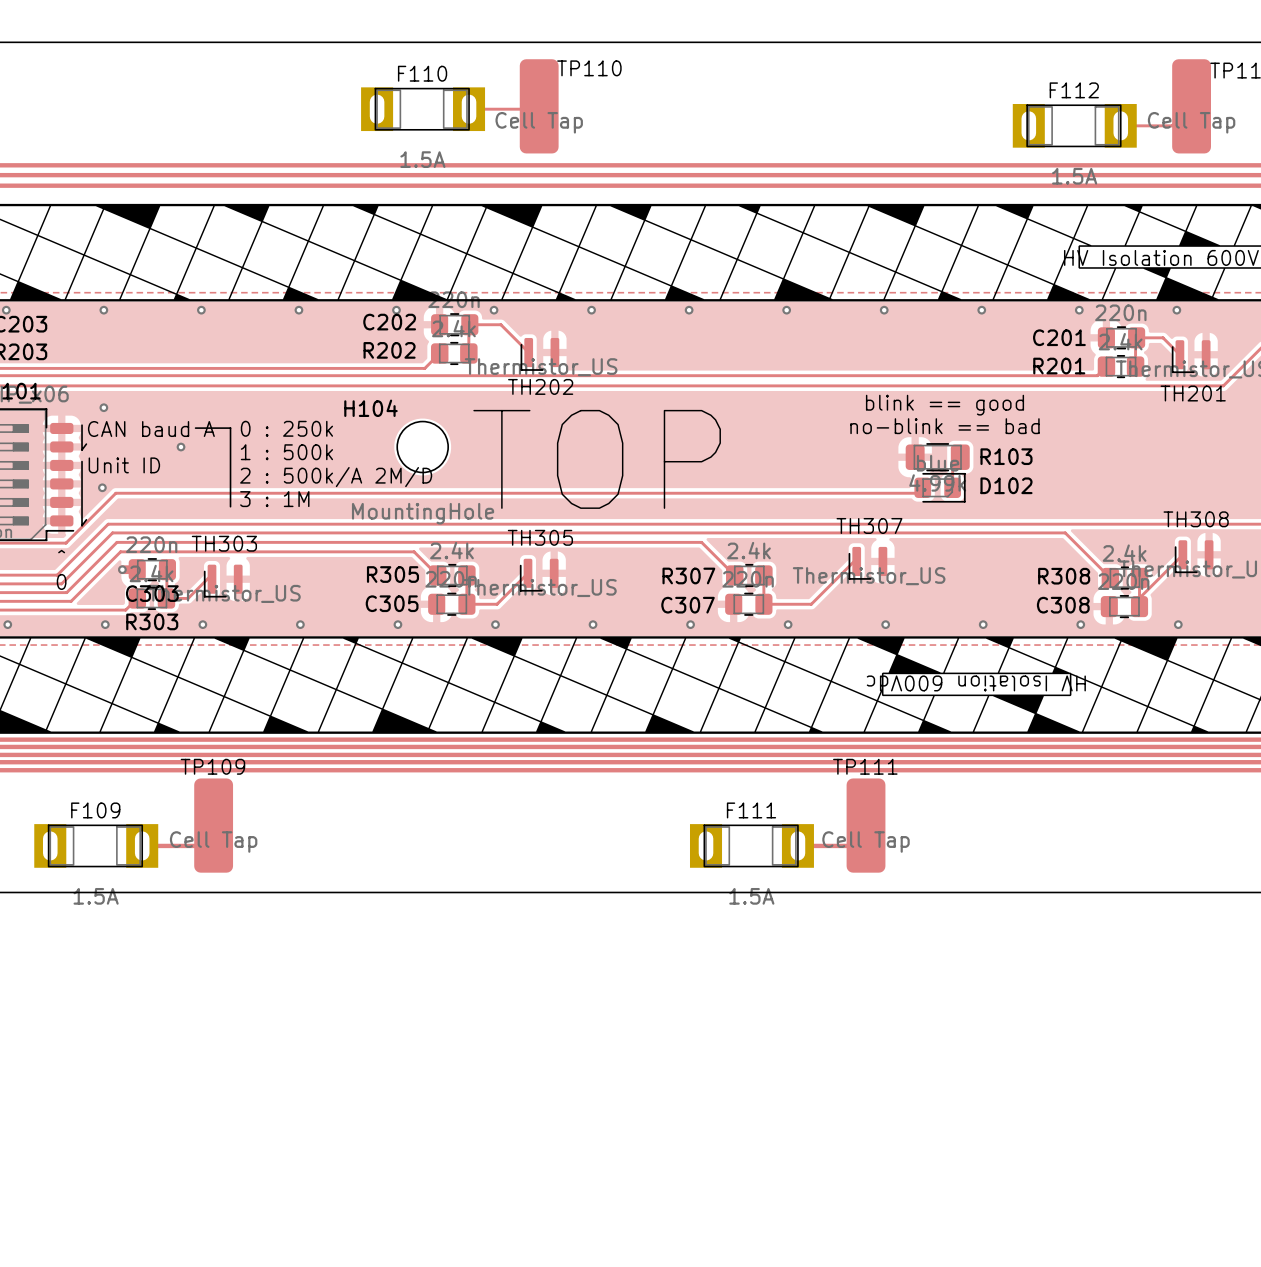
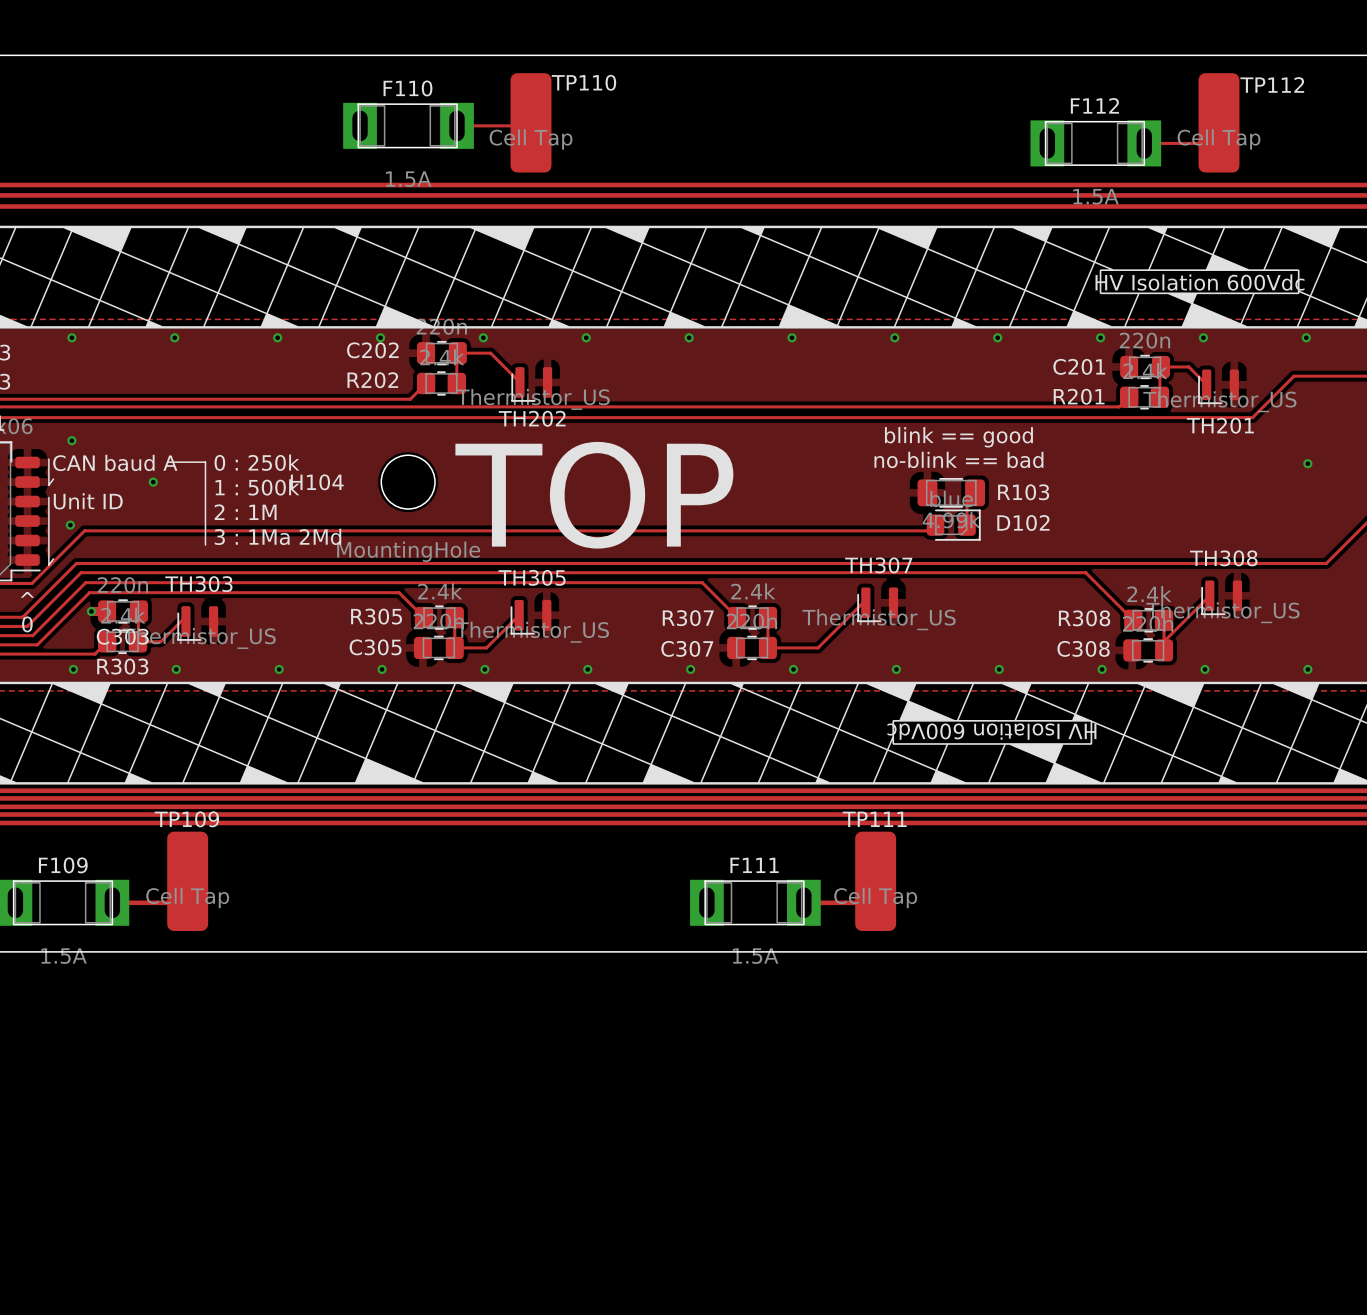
H104 name position: H104 (370, 408) -> H104 (317, 482)
text: 2 : 500k/A 2M/D (336, 477) -> 2 : 1M (245, 512)
text: 3 : 1M (274, 499) -> 3 : 1Ma 2Md (277, 536)

